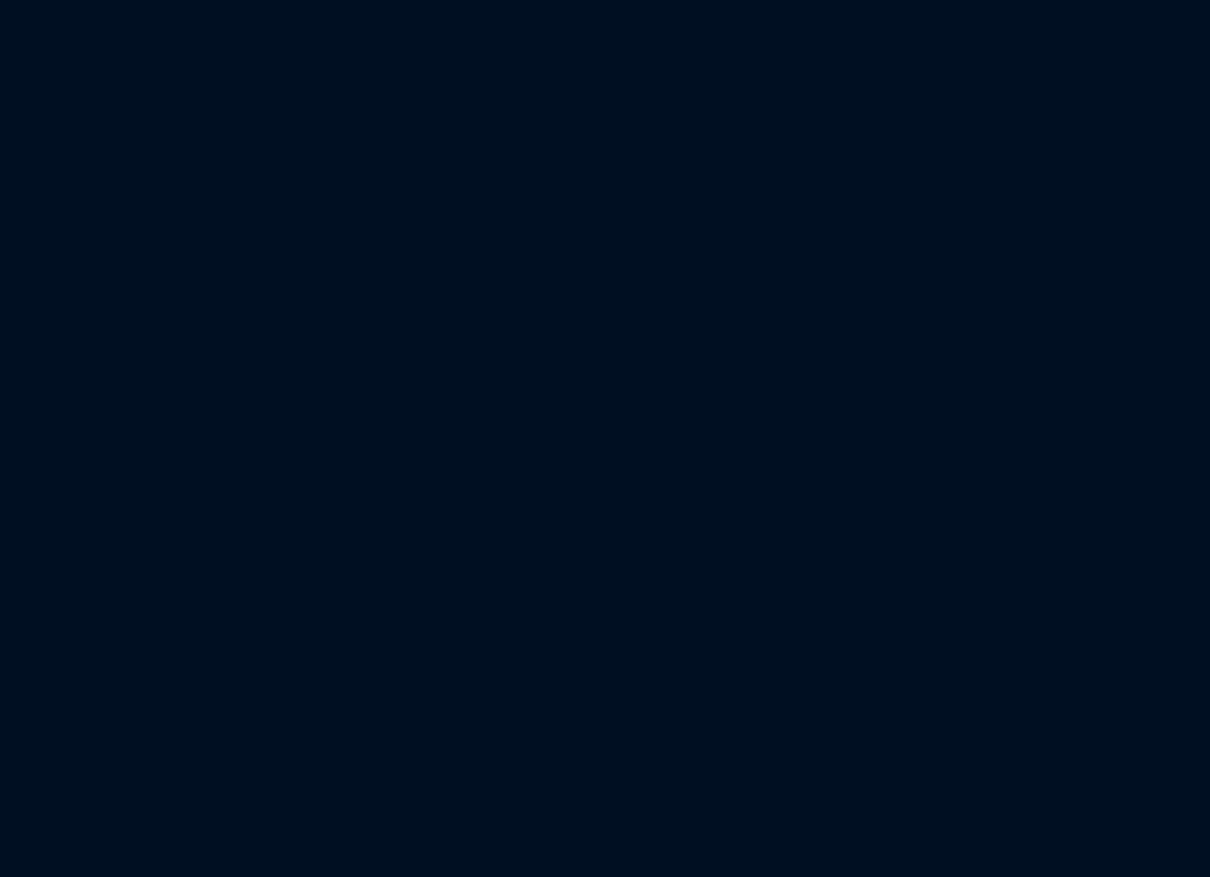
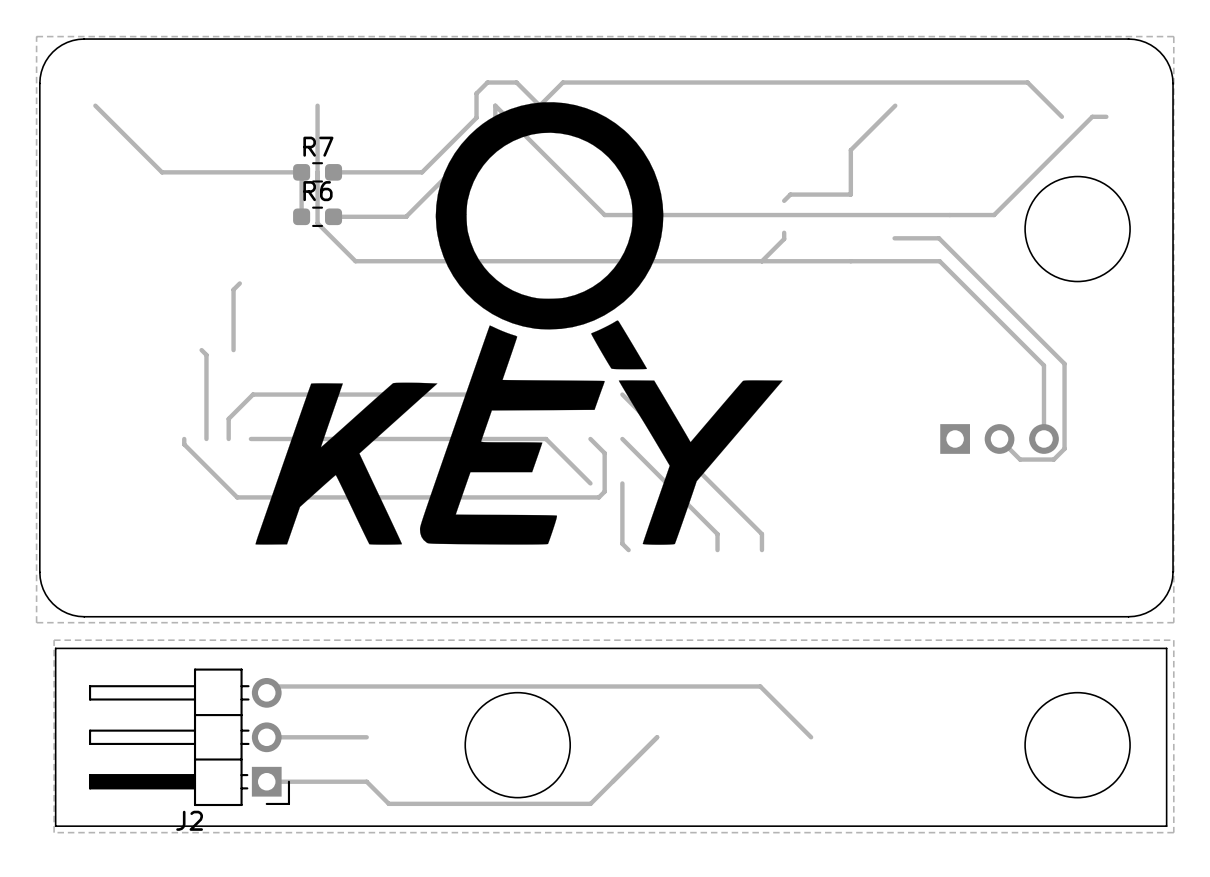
zone outline: none -> (36, 36) (36, 622) (1173, 622) (1173, 36) (36, 36)
drawing: none -> [255, 102, 783, 545]
track: none -> (95, 105) (162, 172) (301, 172) (301, 216)
track: none -> (317, 105) (317, 223) (355, 261) (939, 261) (1043, 365) (1043, 438)
track: none -> (895, 105) (850, 150) (850, 194) (790, 194) (784, 200)
track: none -> (1061, 116) (1027, 82) (562, 82) (539, 105) (516, 82) (487, 82) (476, 93) (476, 117) (422, 172) (333, 172)
track: none -> (1106, 116) (1092, 116) (994, 215) (604, 215) (495, 105) (495, 127) (406, 216)
R7: none -> (317, 172)
round board edge: none -> [1024, 176, 1131, 282]
R6: none -> (317, 216)
track: none -> (333, 216) (406, 216)
track: none -> (784, 232) (784, 239) (761, 261)
track: none -> (894, 238) (939, 238) (1064, 363) (1064, 448) (1053, 459) (1020, 459) (999, 438)
track: none -> (239, 283) (233, 289) (233, 350)
track: none -> (201, 350) (206, 354) (206, 438)
track: none -> (590, 394) (253, 394) (228, 418) (228, 438)
track: none -> (622, 394) (761, 534) (761, 550)
track: none -> (184, 438) (184, 444) (237, 497) (598, 497) (604, 491) (604, 453) (590, 438)
track: none -> (250, 438) (546, 438) (590, 483)
track: none -> (622, 438) (717, 534) (717, 550)
part: none -> (999, 438)
track: none -> (622, 483) (622, 543) (628, 550)
board edge: none -> (1173, 572) (1169, 589) (1160, 603) (1145, 613) (1128, 616) (84, 616) (67, 613) (52, 603) (45, 594) (41, 583) (39, 572) (39, 83) (43, 66) (49, 56) (57, 48) (72, 40) (84, 39) (1128, 39) (1145, 42) (1160, 52) (1167, 61) (1171, 71) (1173, 83) (1173, 572)
zone outline: none -> (54, 640) (54, 832) (1173, 832) (1173, 640) (54, 640)
board edge: none -> (55, 648) (55, 826) (1166, 826) (1166, 648) (55, 648)
track: none -> (266, 692) (273, 686) (760, 686) (811, 737)
round board edge: none -> [464, 692, 571, 799]
round board edge: none -> [1024, 692, 1131, 799]
J2: none -> (189, 737)
track: none -> (266, 737) (366, 737)
track: none -> (657, 737) (590, 803) (388, 803) (366, 781) (266, 781)

